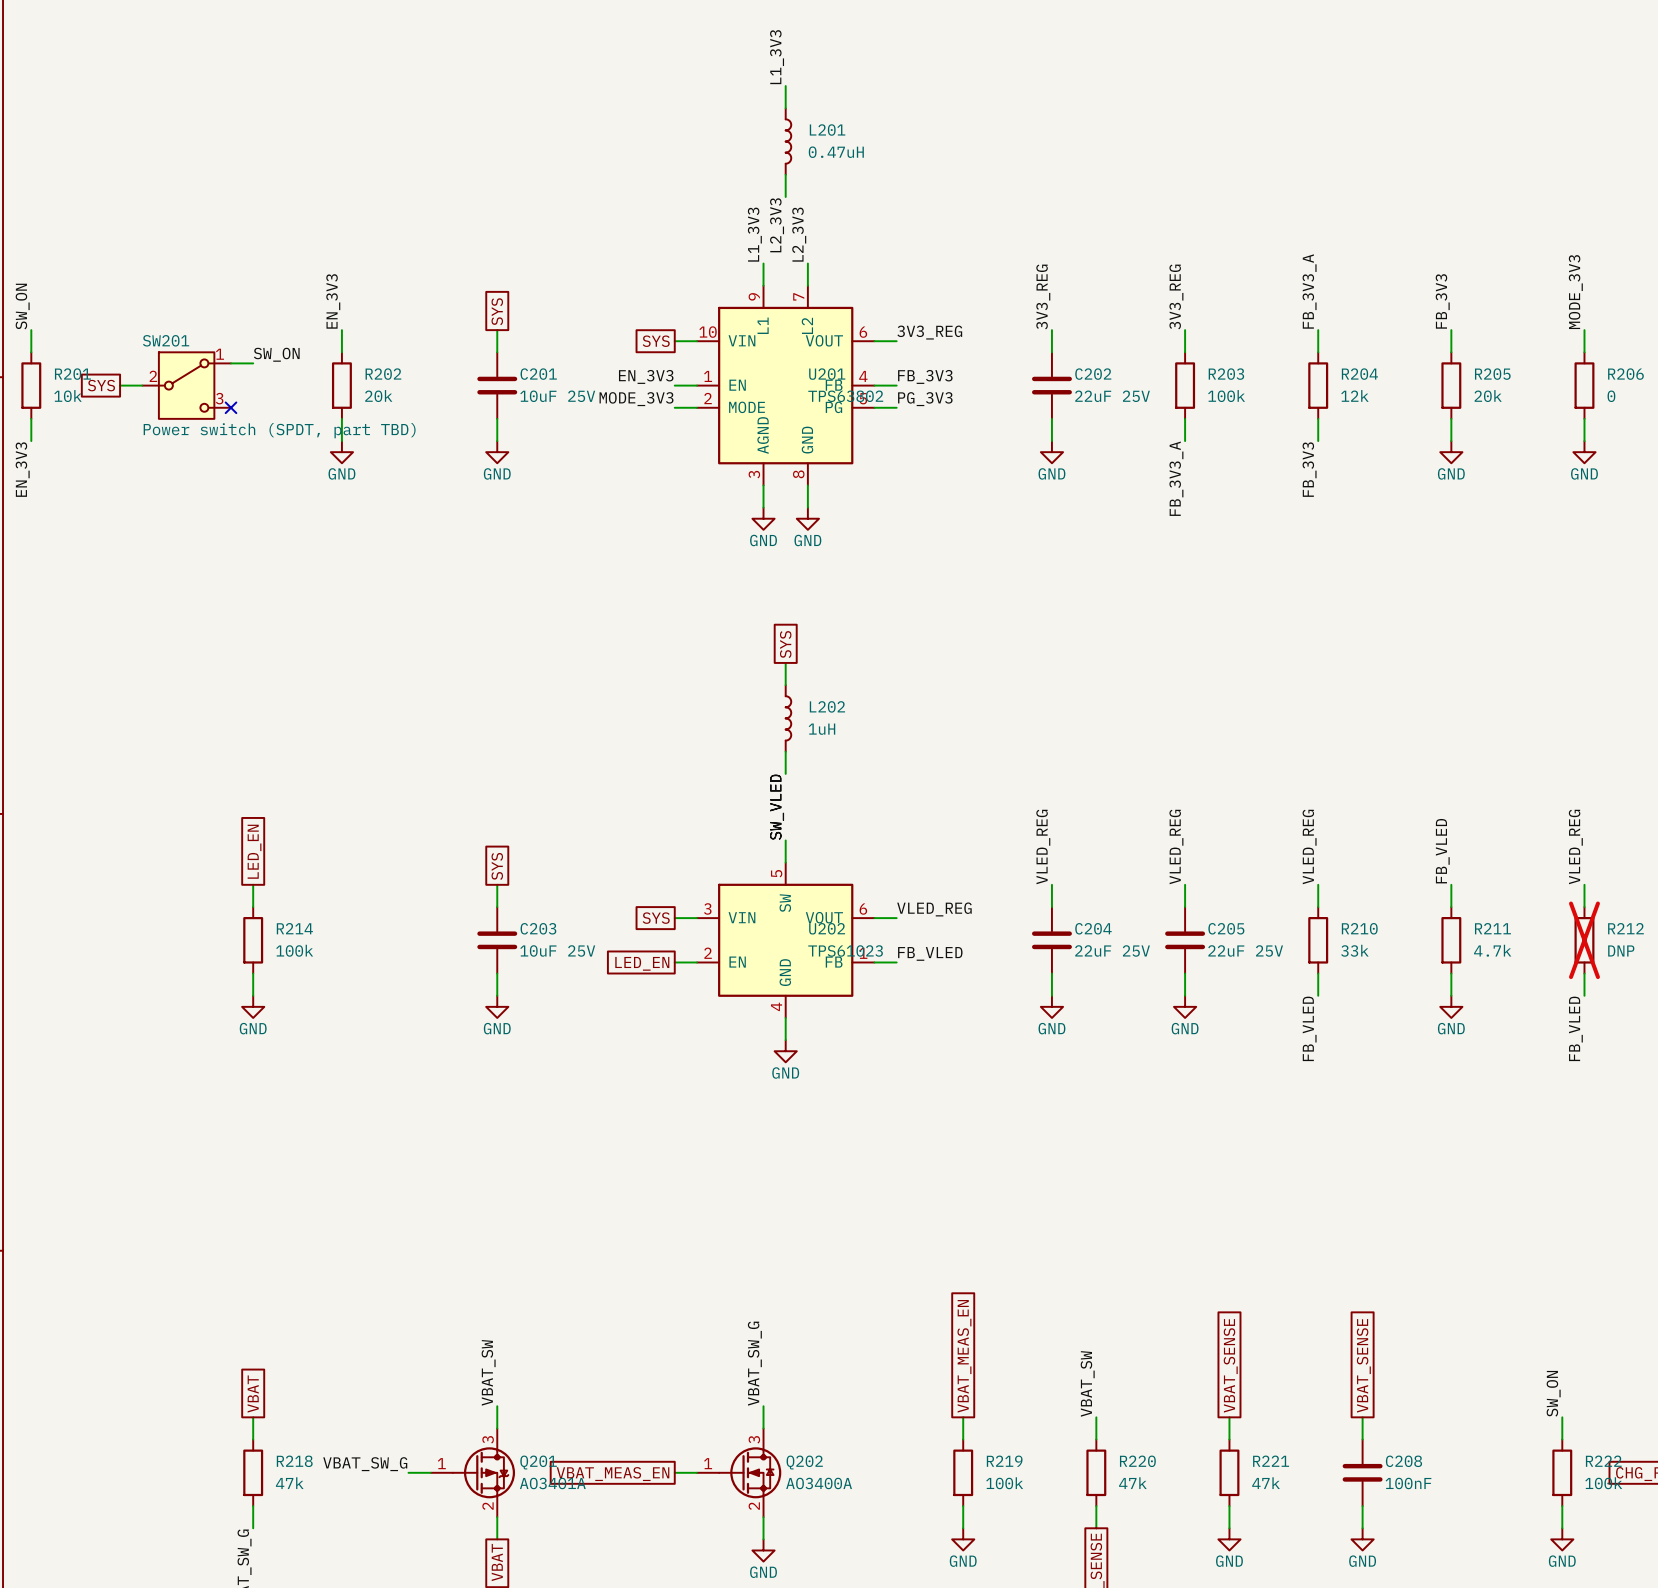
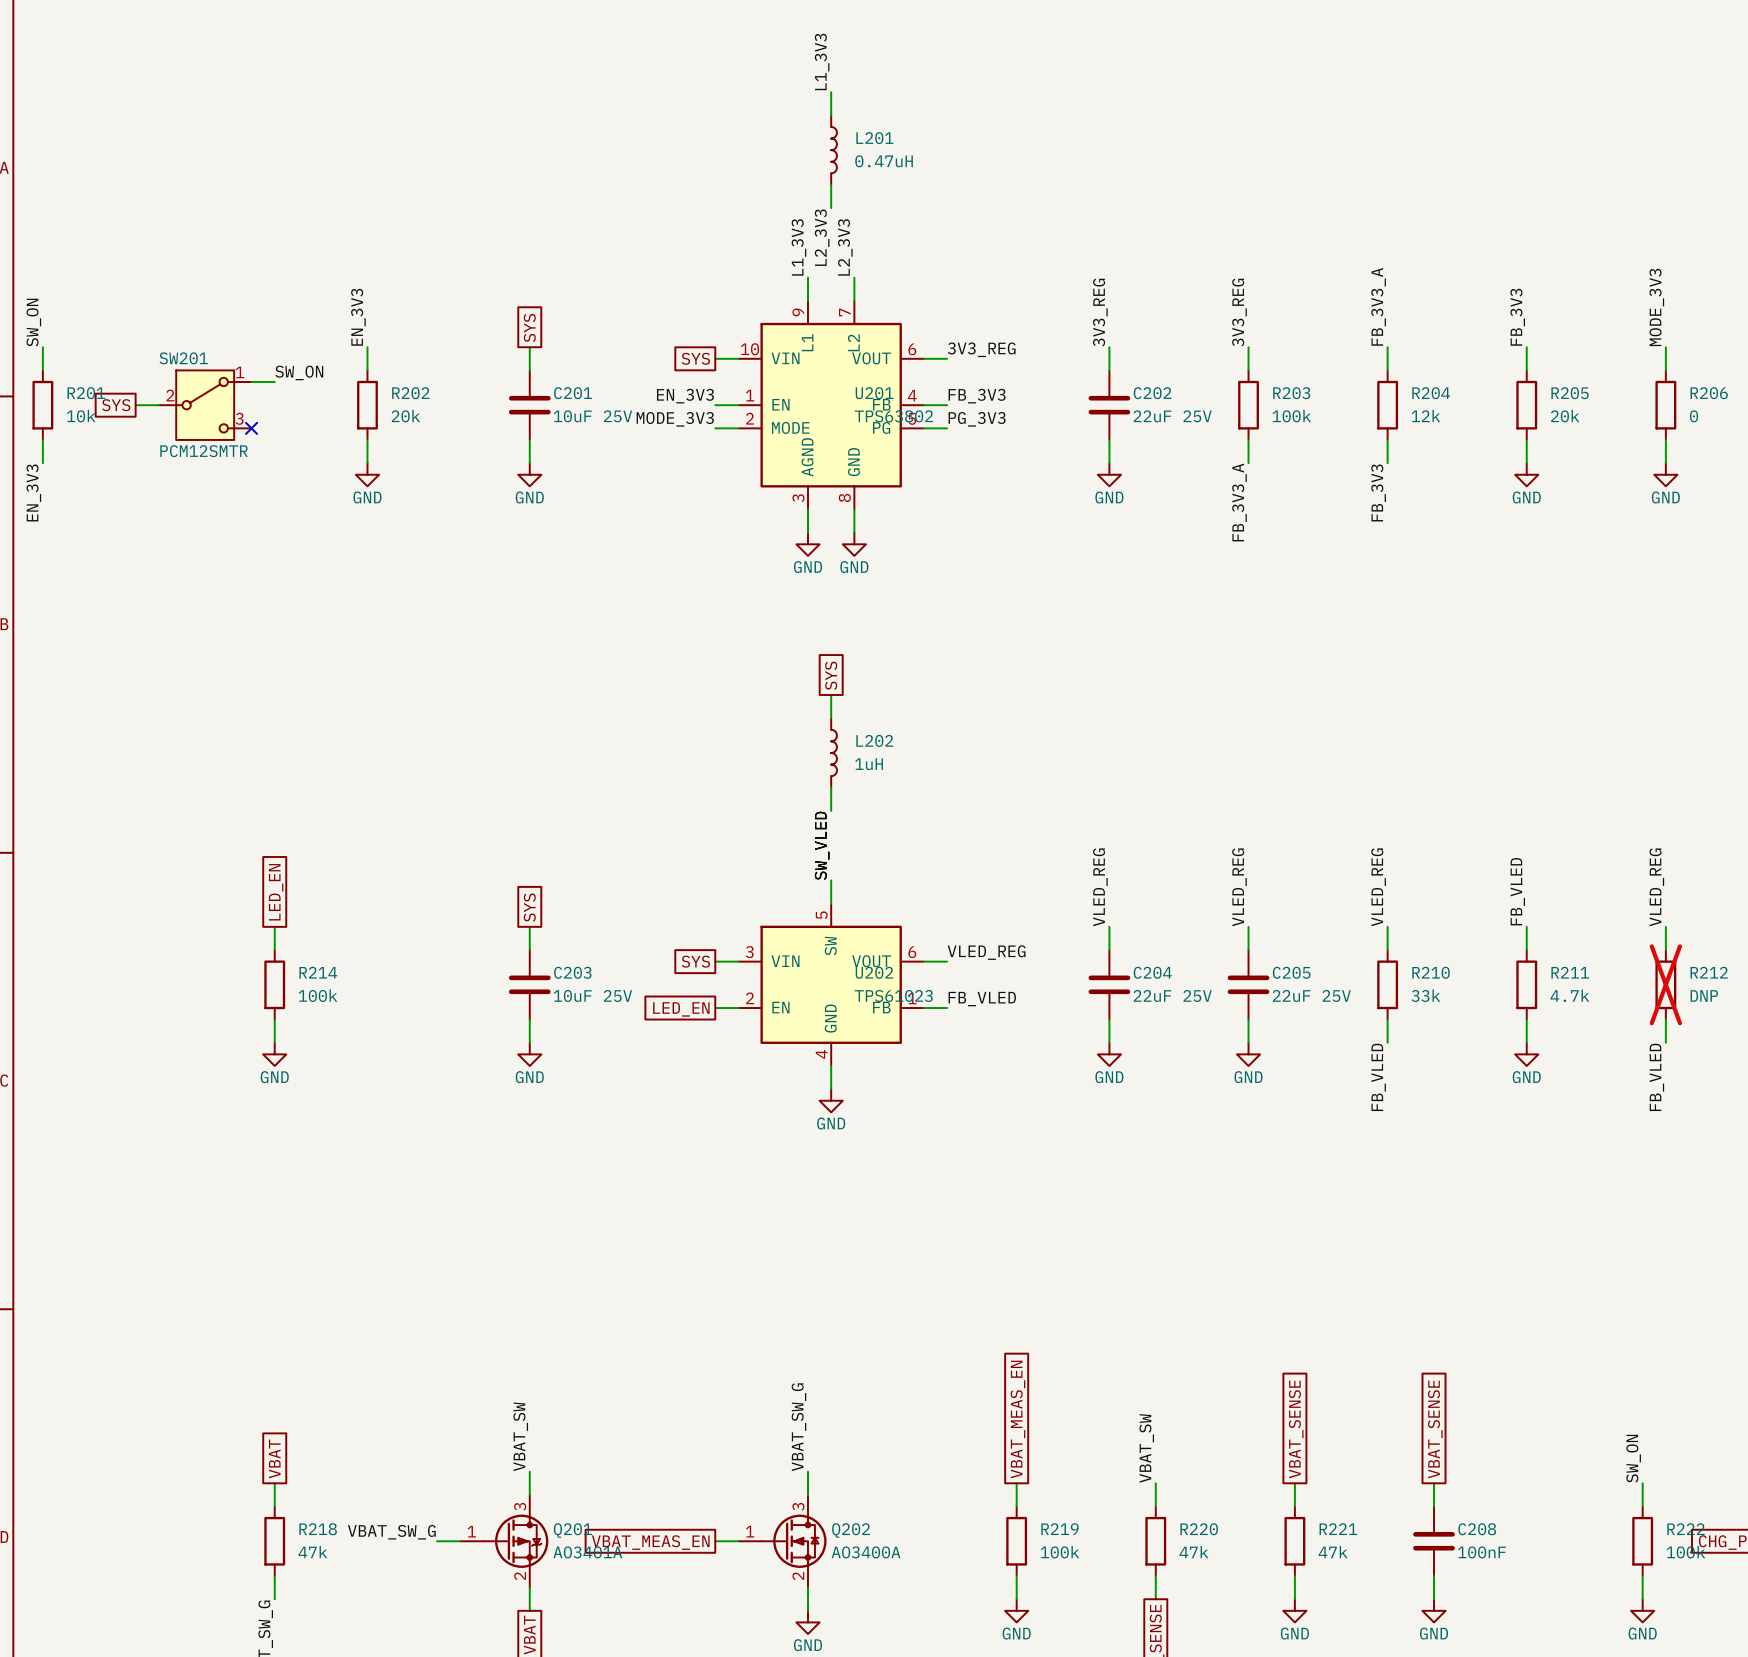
SW201 value: Power switch (SPDT, part TBD) (279, 430) -> PCM12SMTR (203, 451)

